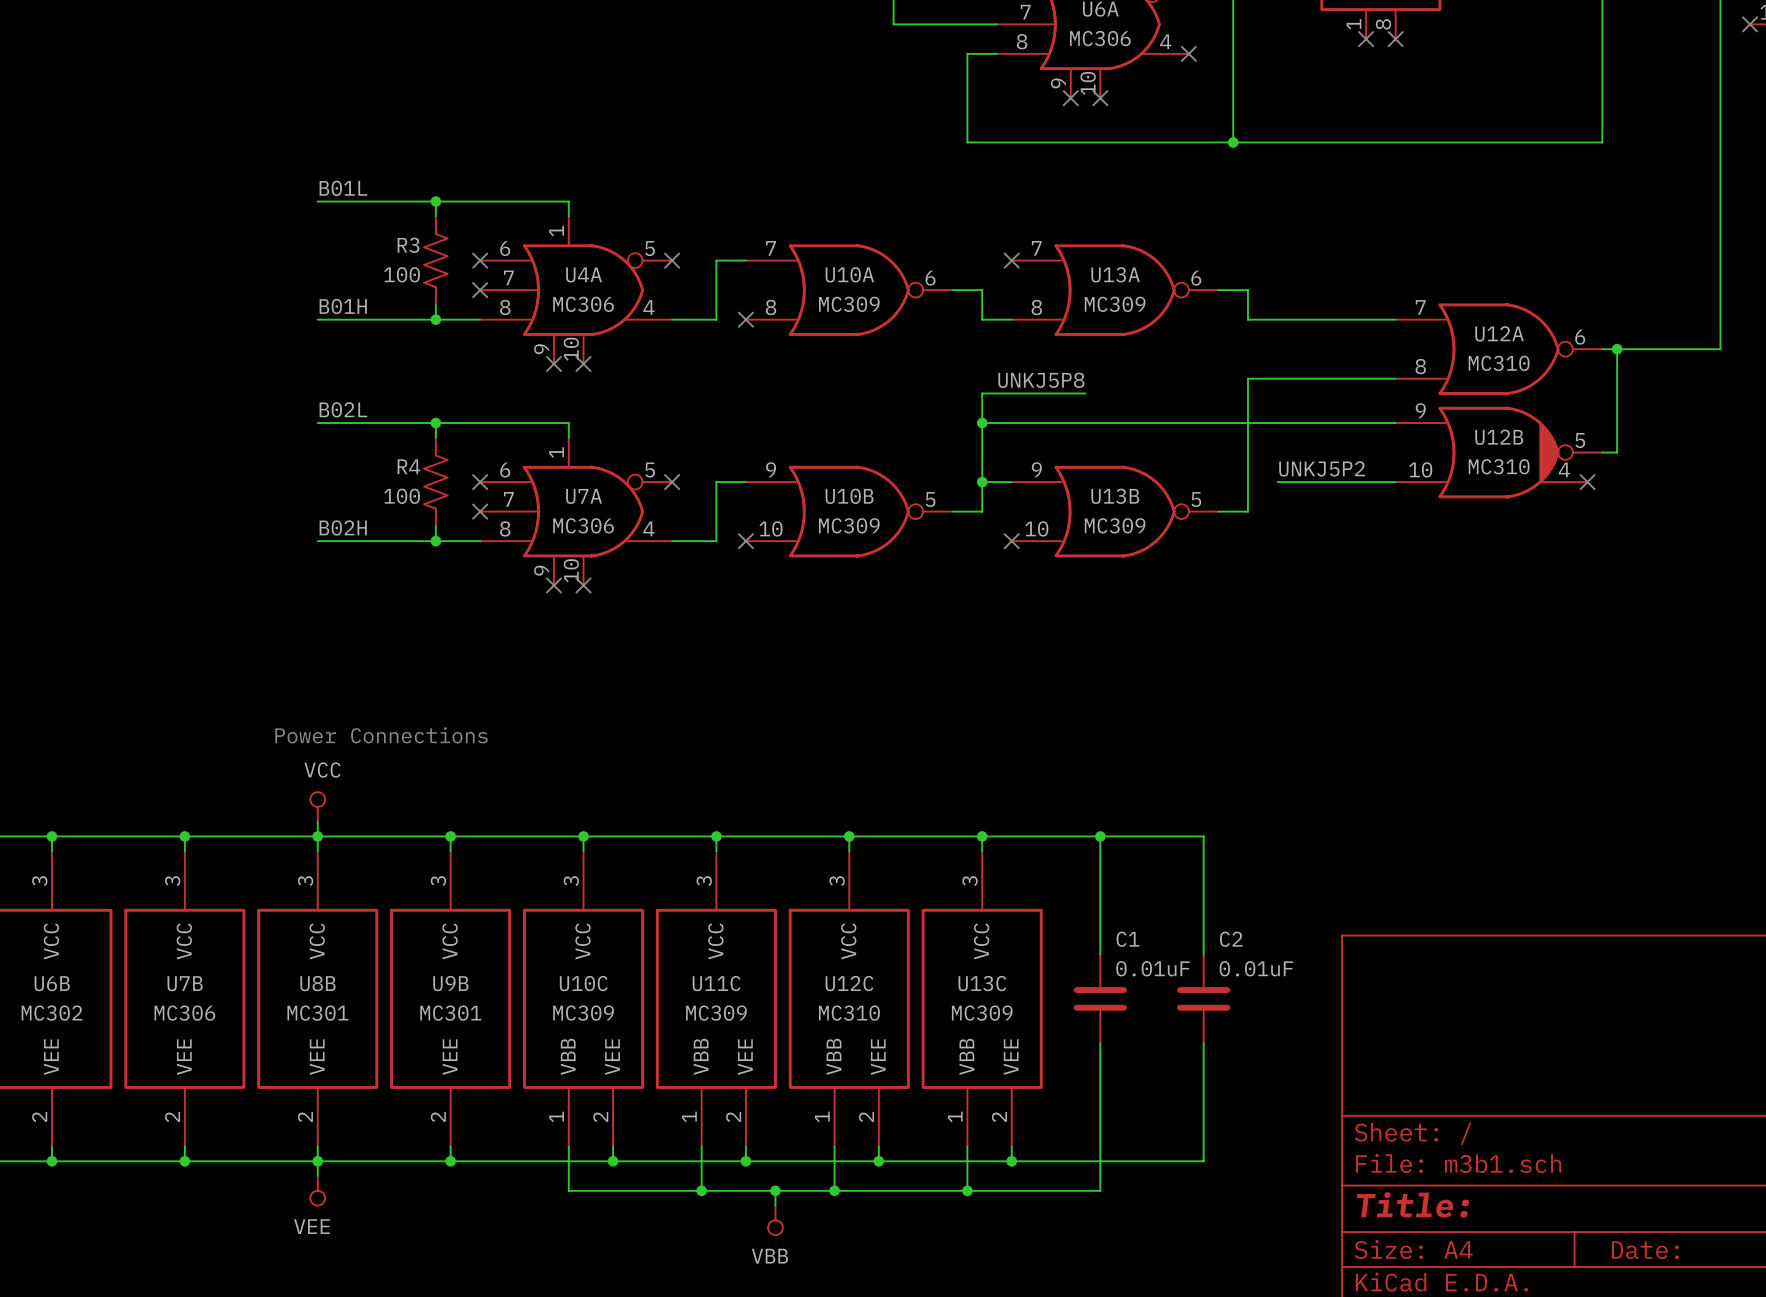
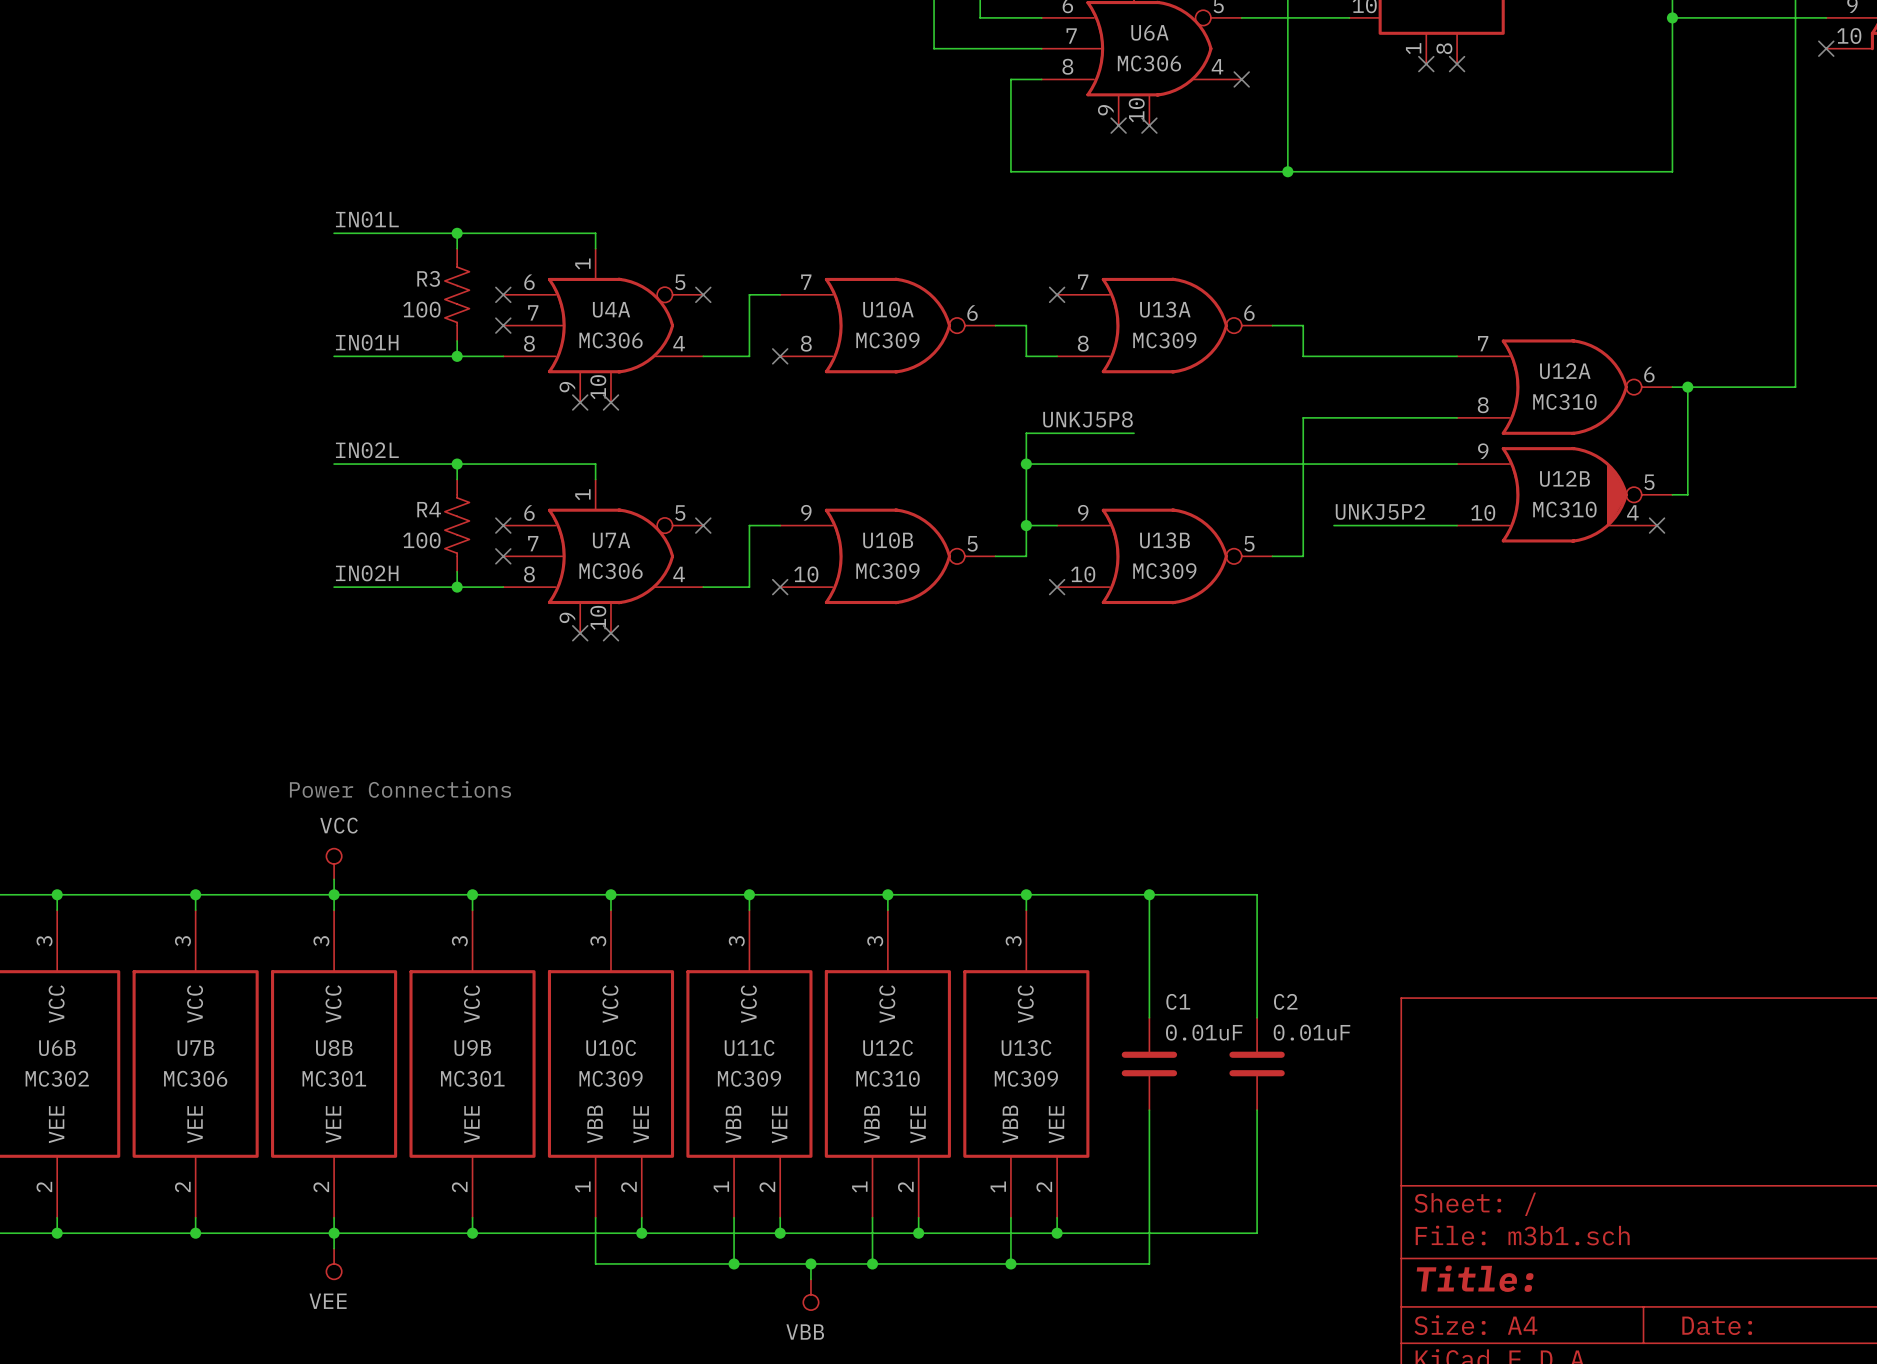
label: B01L (343, 188) -> IN01L (367, 219)
label: B01H (343, 306) -> IN01H (367, 342)
label: B02L (343, 409) -> IN02L (367, 450)
label: B02H (343, 527) -> IN02H (367, 573)

